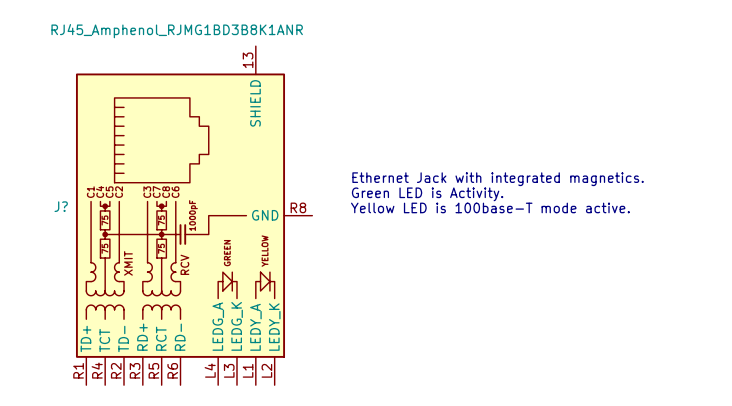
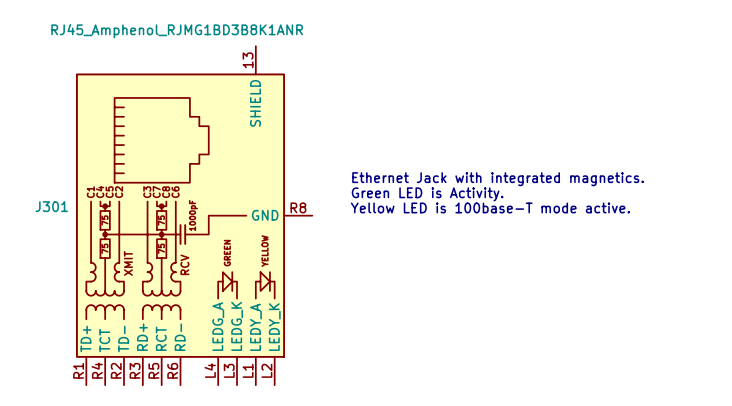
J? name: J? (61, 206) -> J301 (51, 206)

